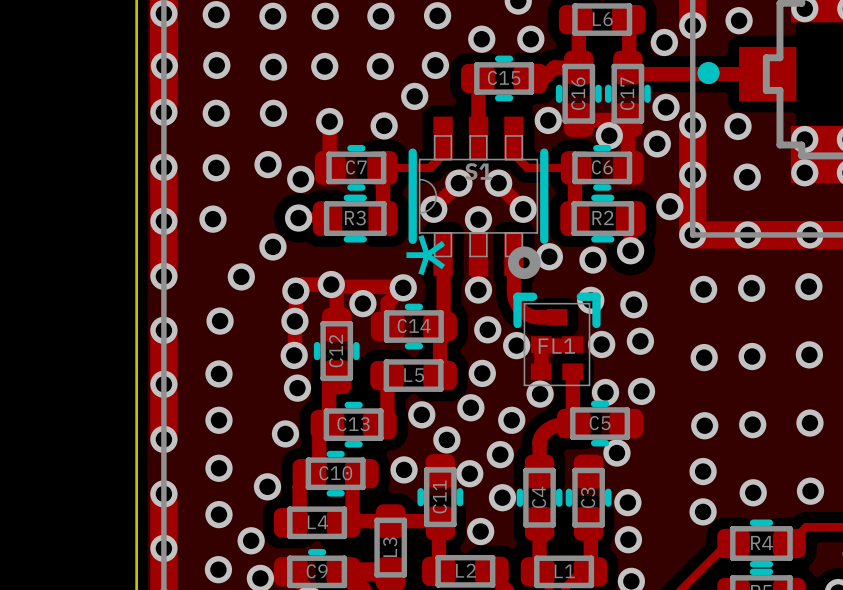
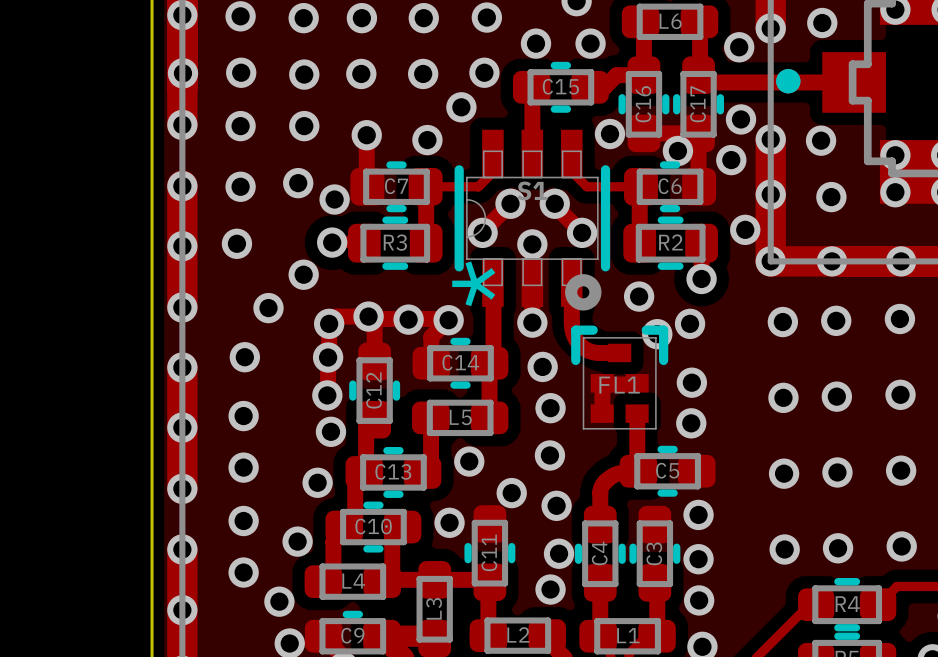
via: (549, 256) -> none
via: (592, 260) -> none
via: none -> (639, 296)
via position: (362, 303) -> (408, 319)
via position: (633, 304) -> (690, 323)
via: (640, 341) -> none
via: none -> (691, 382)
via: (601, 344) -> none
via: (516, 345) -> none
via position: (482, 373) -> (550, 408)
via: none -> (691, 423)
via: (641, 391) -> none
via: (605, 392) -> none
via: (540, 394) -> none
via: (470, 407) -> none
via: none -> (549, 455)
via: (511, 420) -> none
via position: (446, 439) -> (511, 493)
via position: (616, 453) -> (698, 514)
via: (703, 471) -> none
via: (469, 473) -> none
via: none -> (784, 549)
via: (703, 511) -> none
via position: (480, 531) -> (550, 589)
via: (218, 569) -> none

